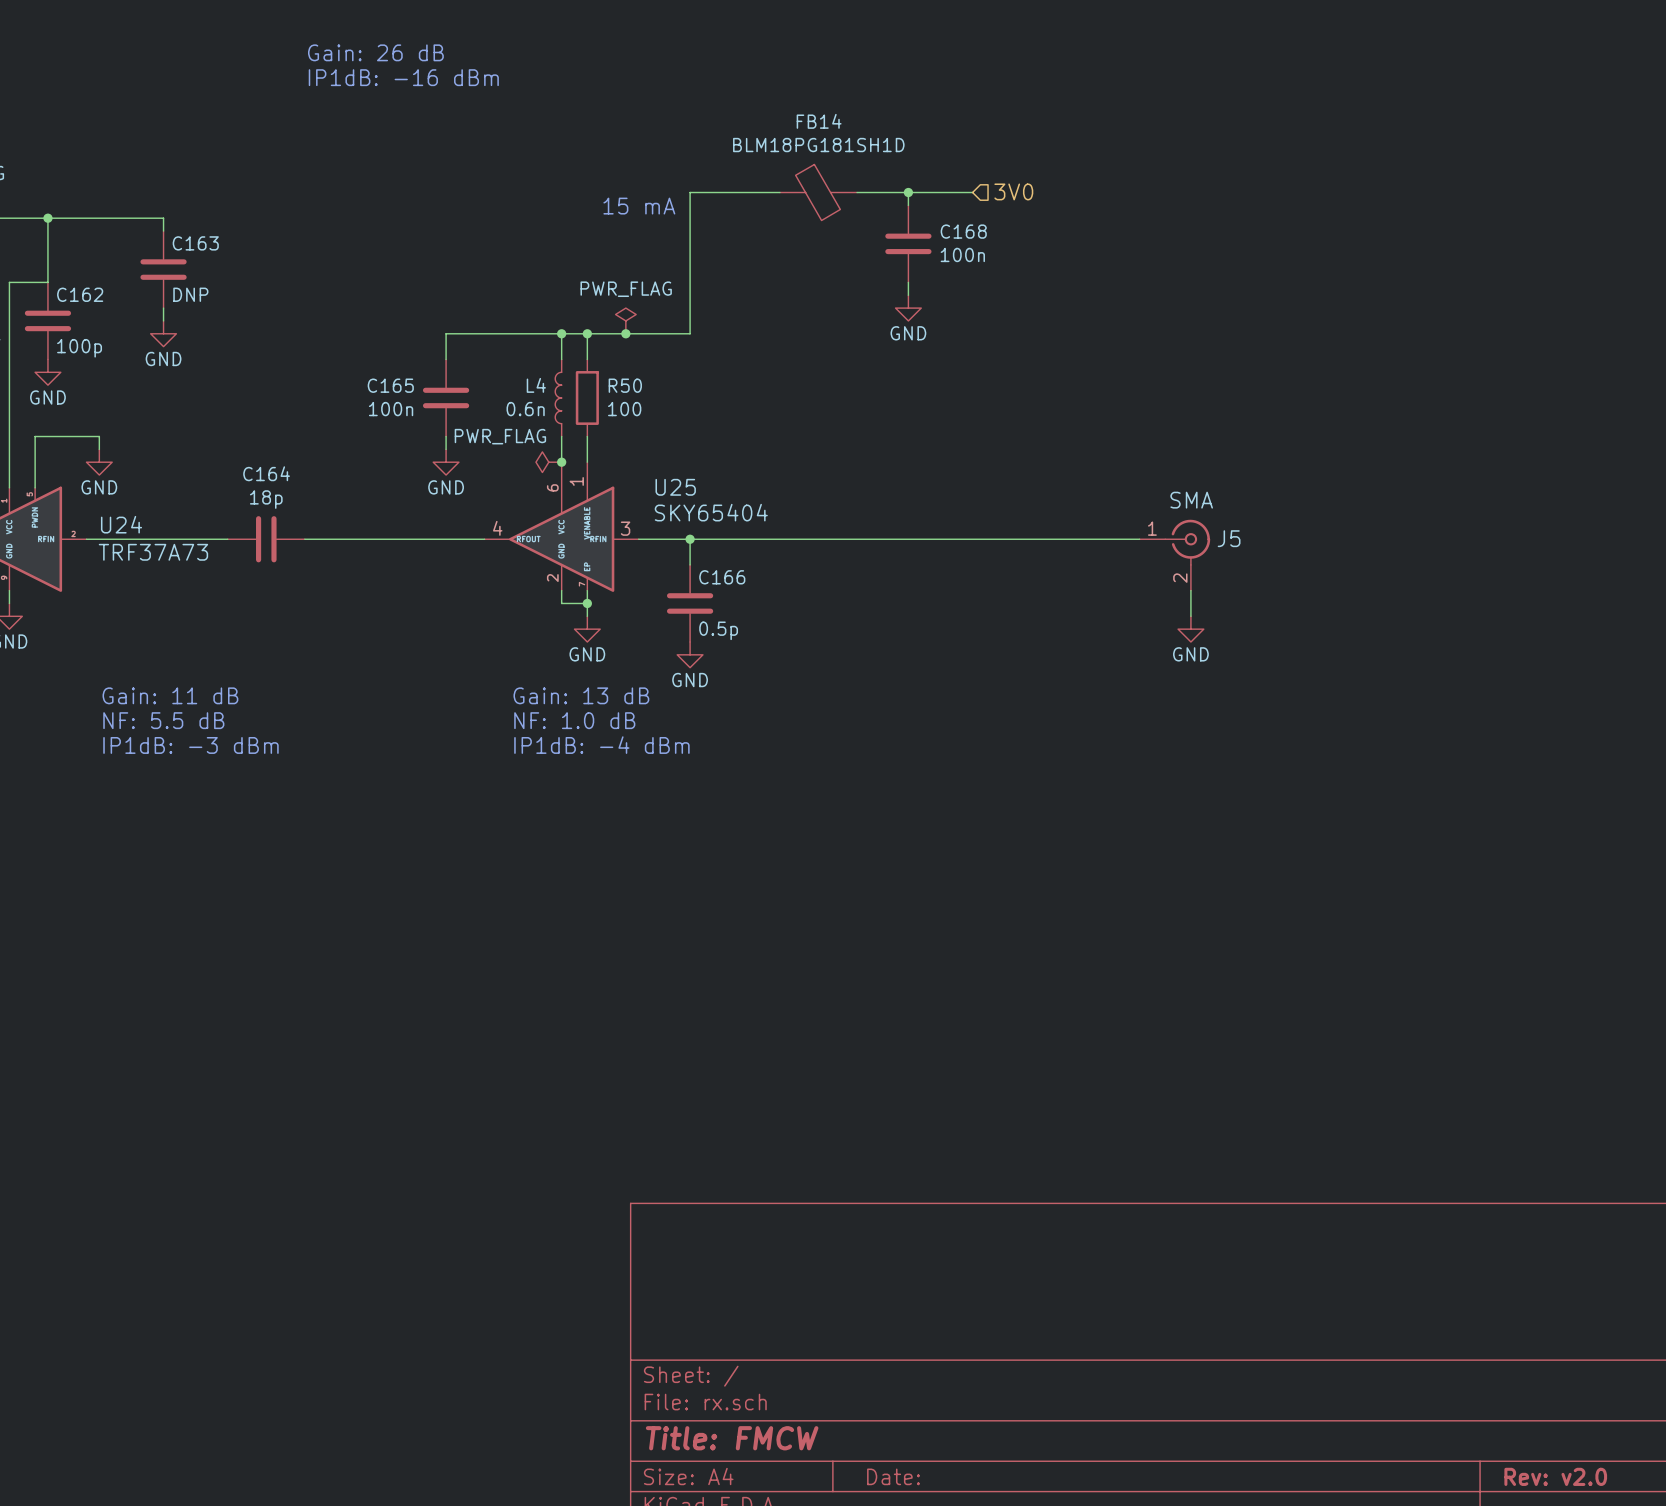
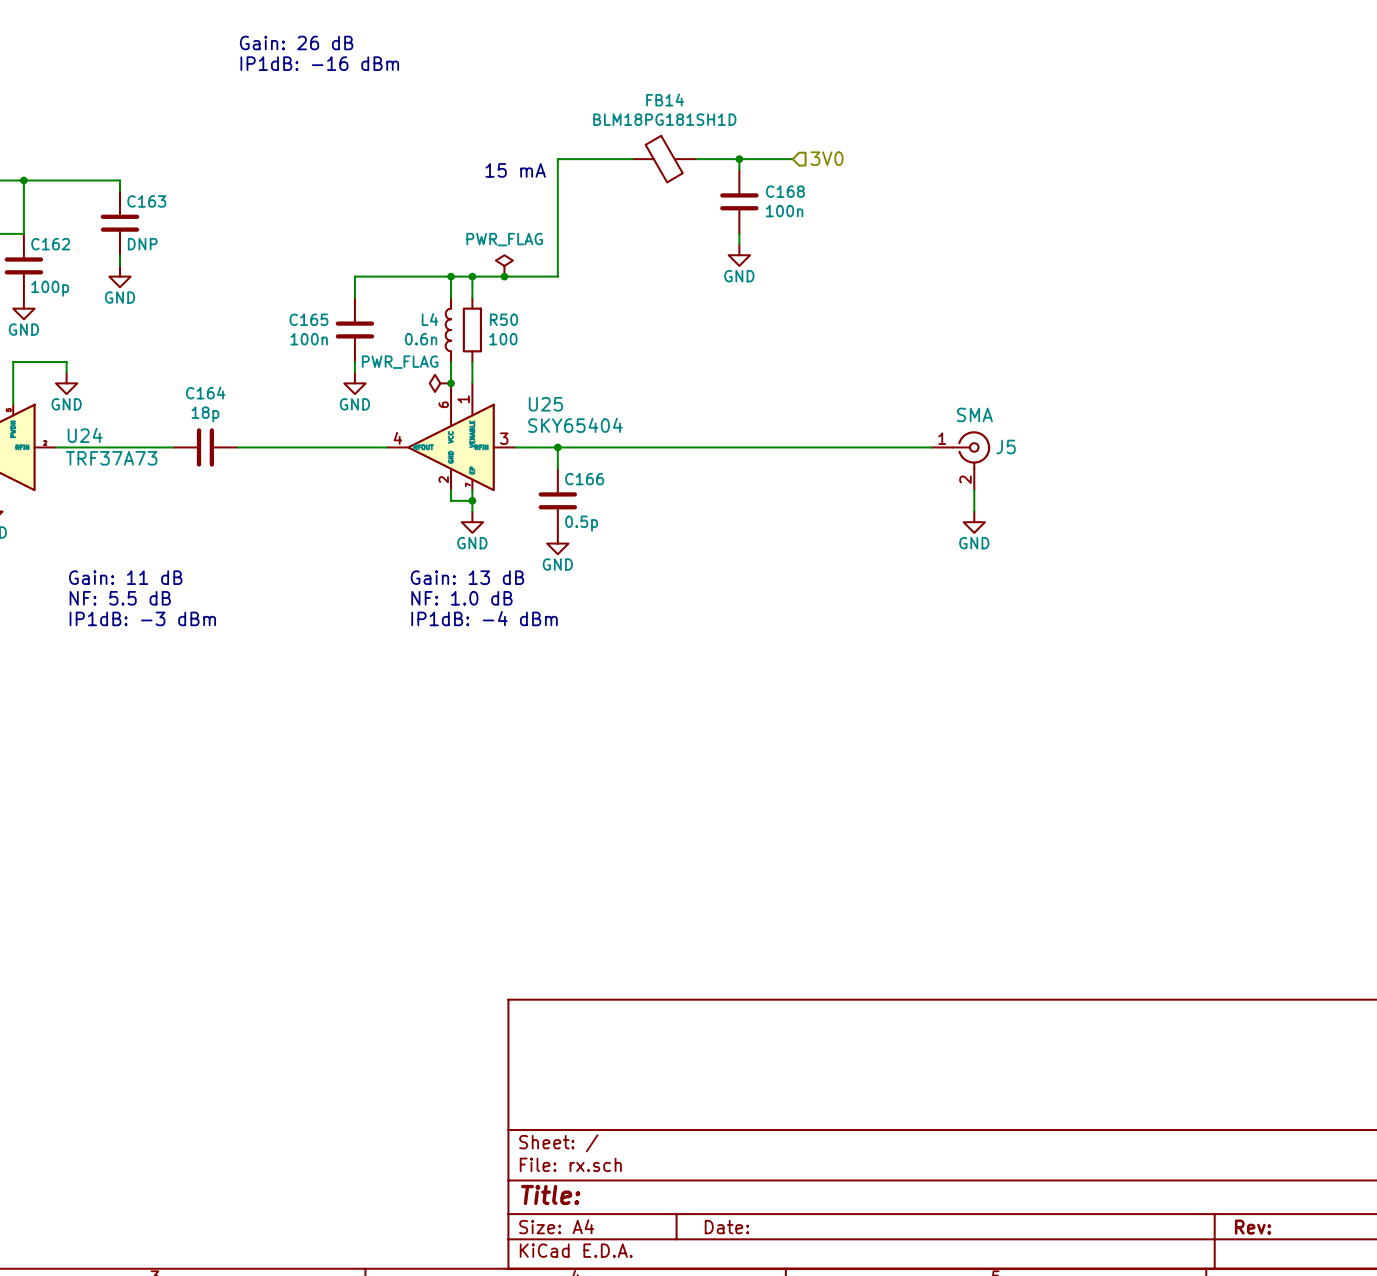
title block: Title: FMCW (732, 1438) -> Title: (550, 1194)
title block: Rev: v2.0 (1555, 1476) -> Rev: (1253, 1227)

